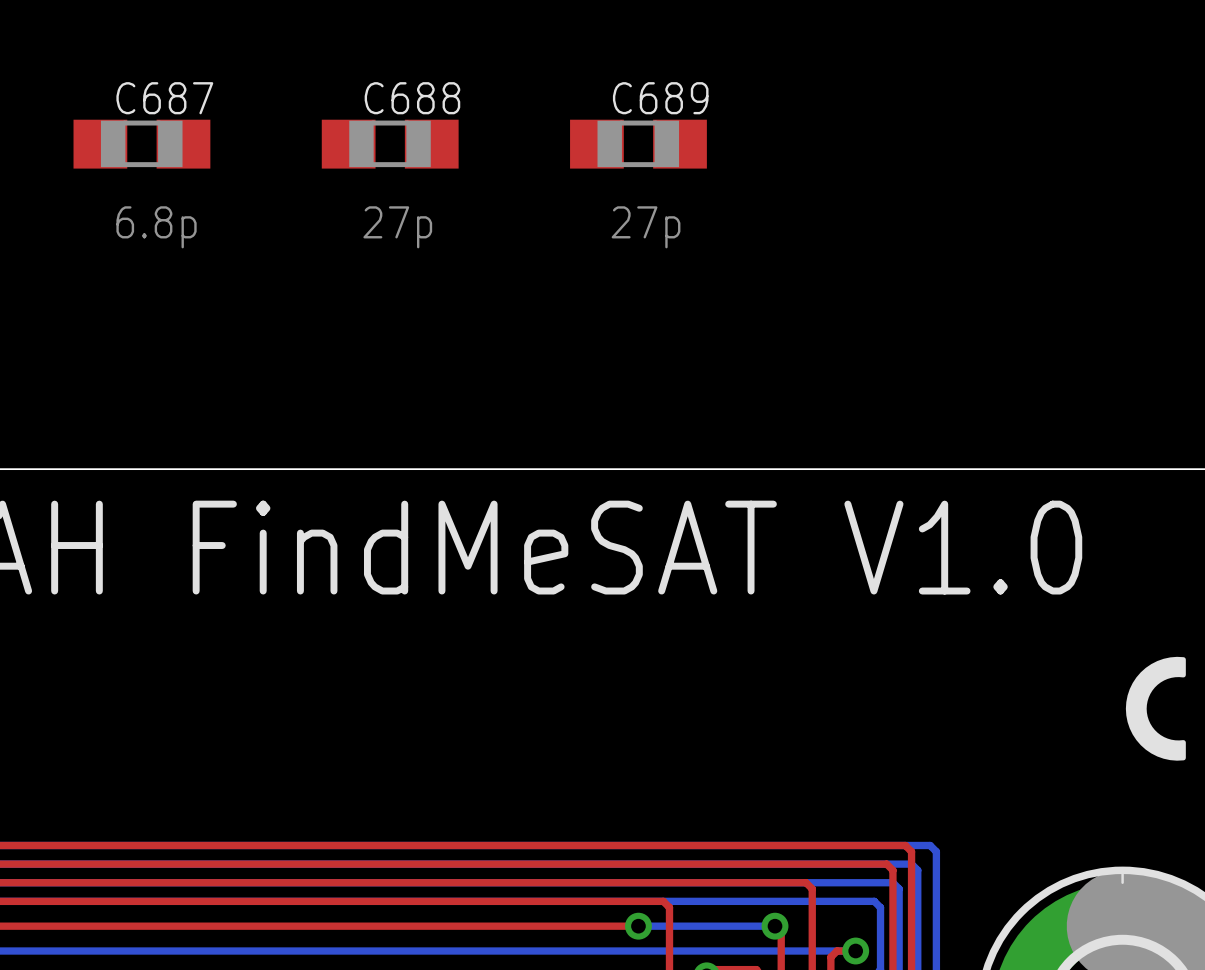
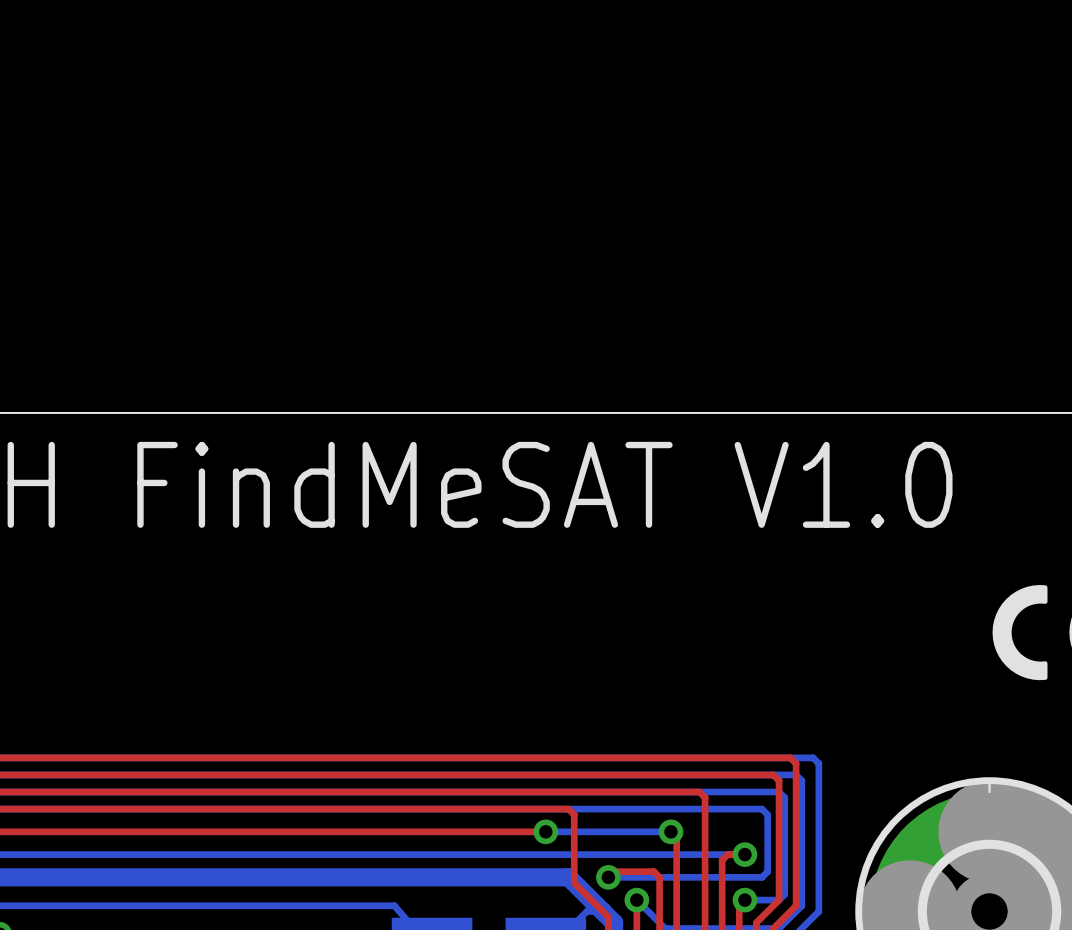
C687: 6.8p (141, 144) -> none
C688: 27p (390, 144) -> none
C689: 27p (638, 144) -> none

